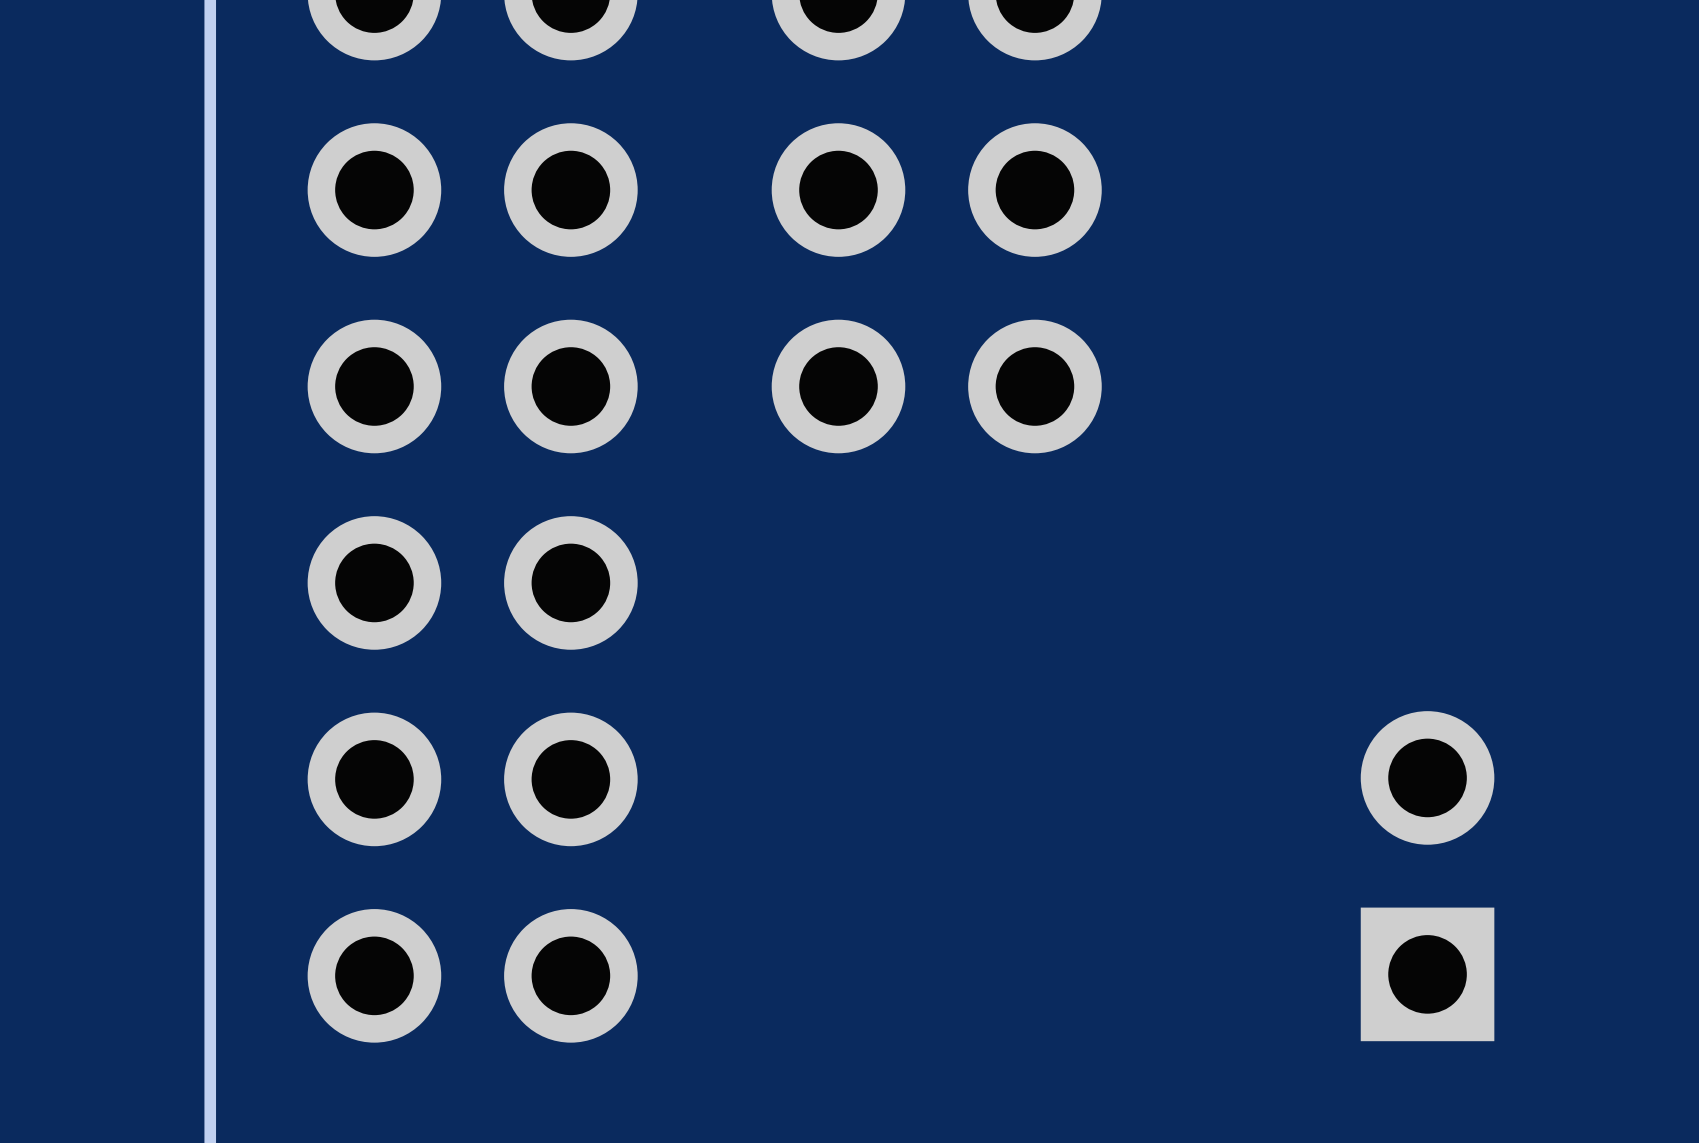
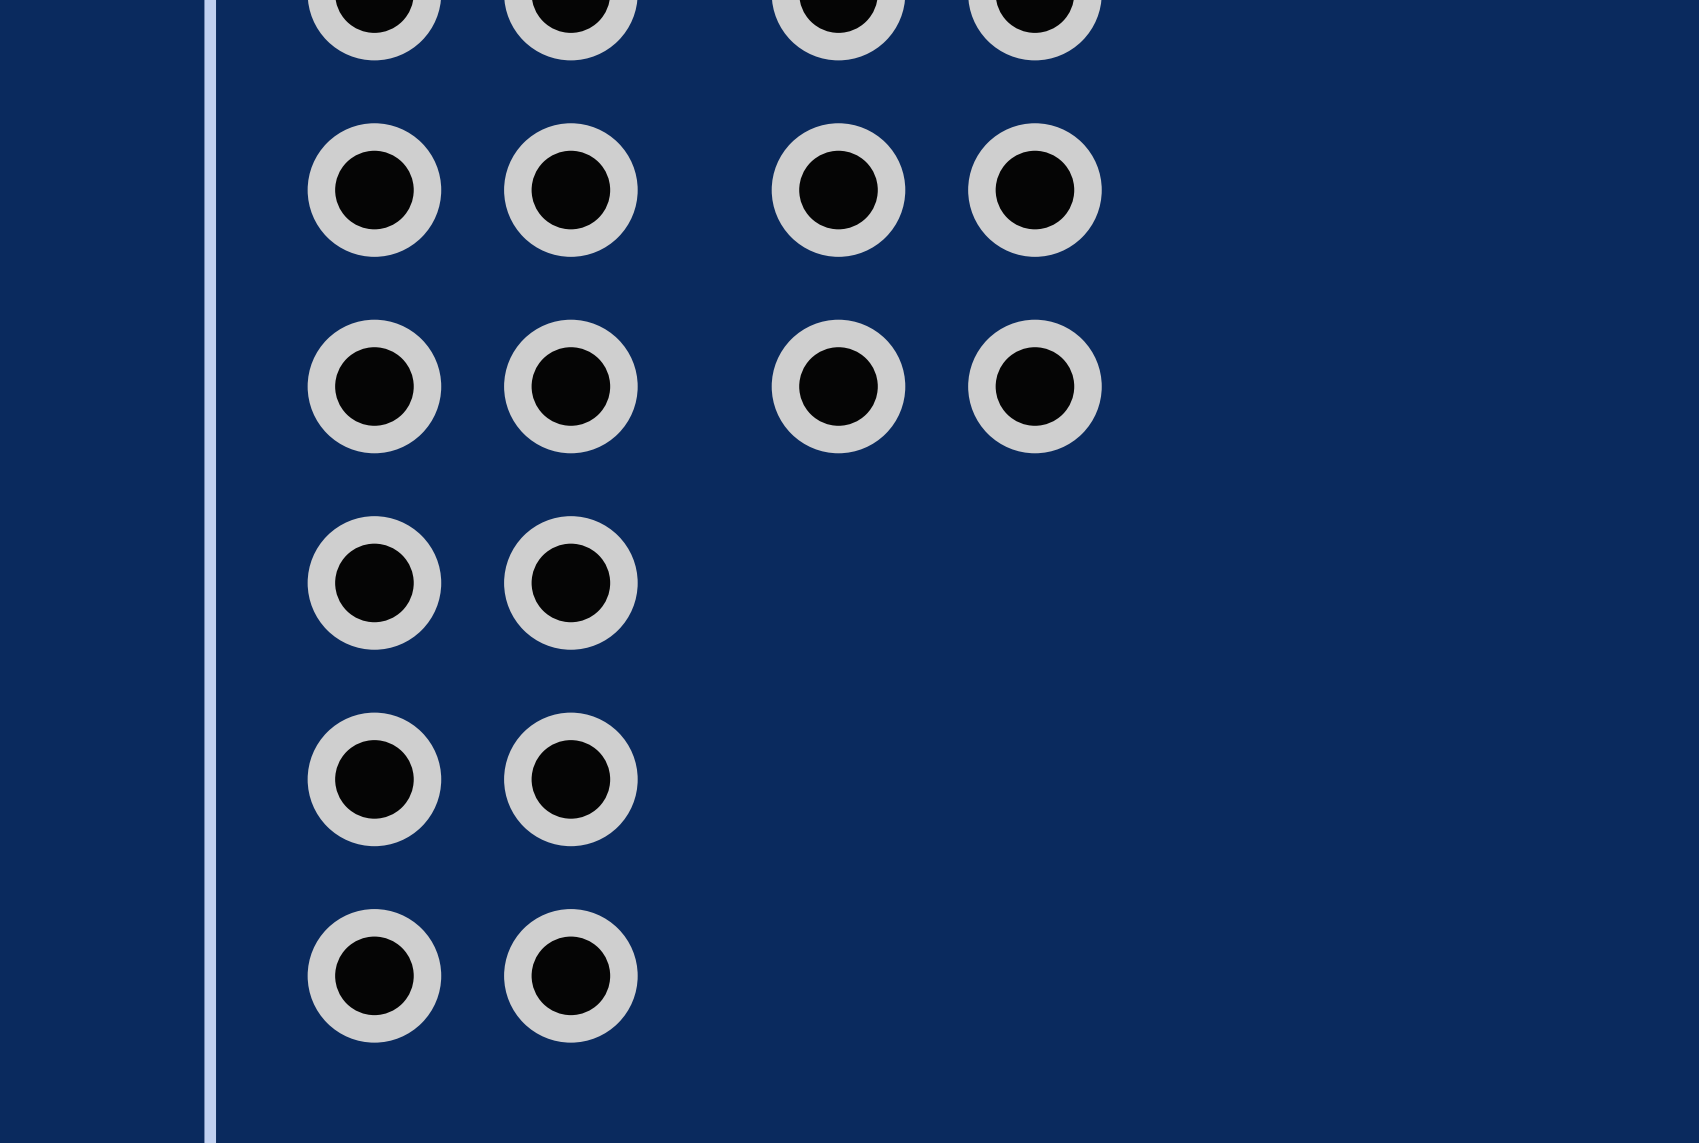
part: (1427, 876) -> none

